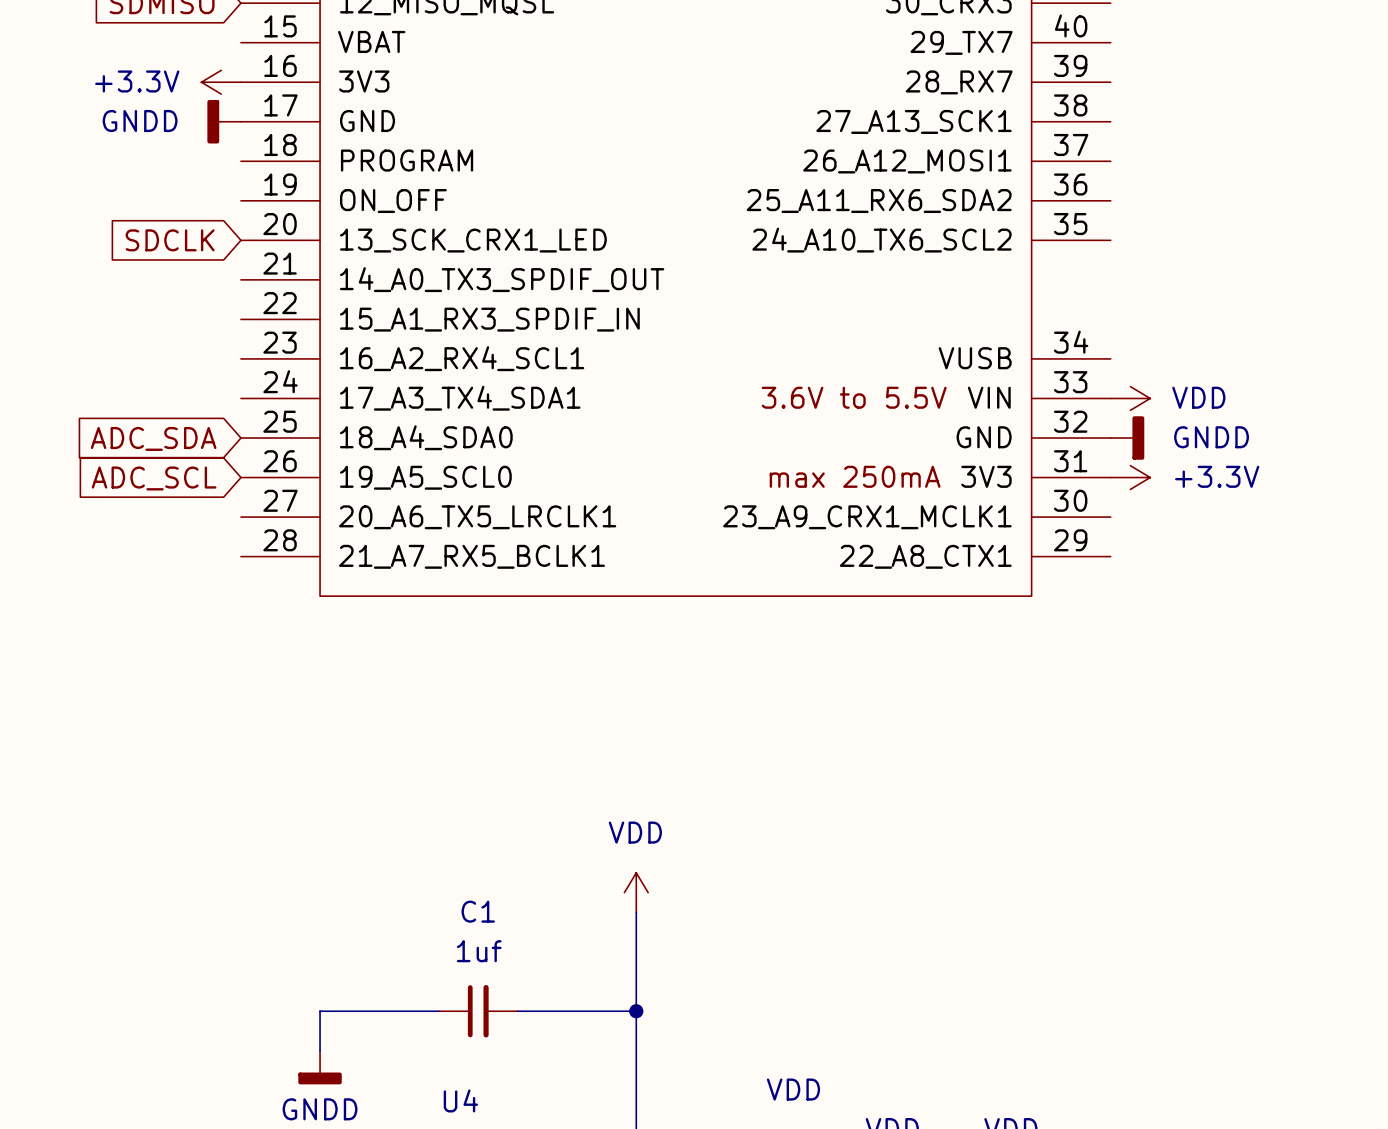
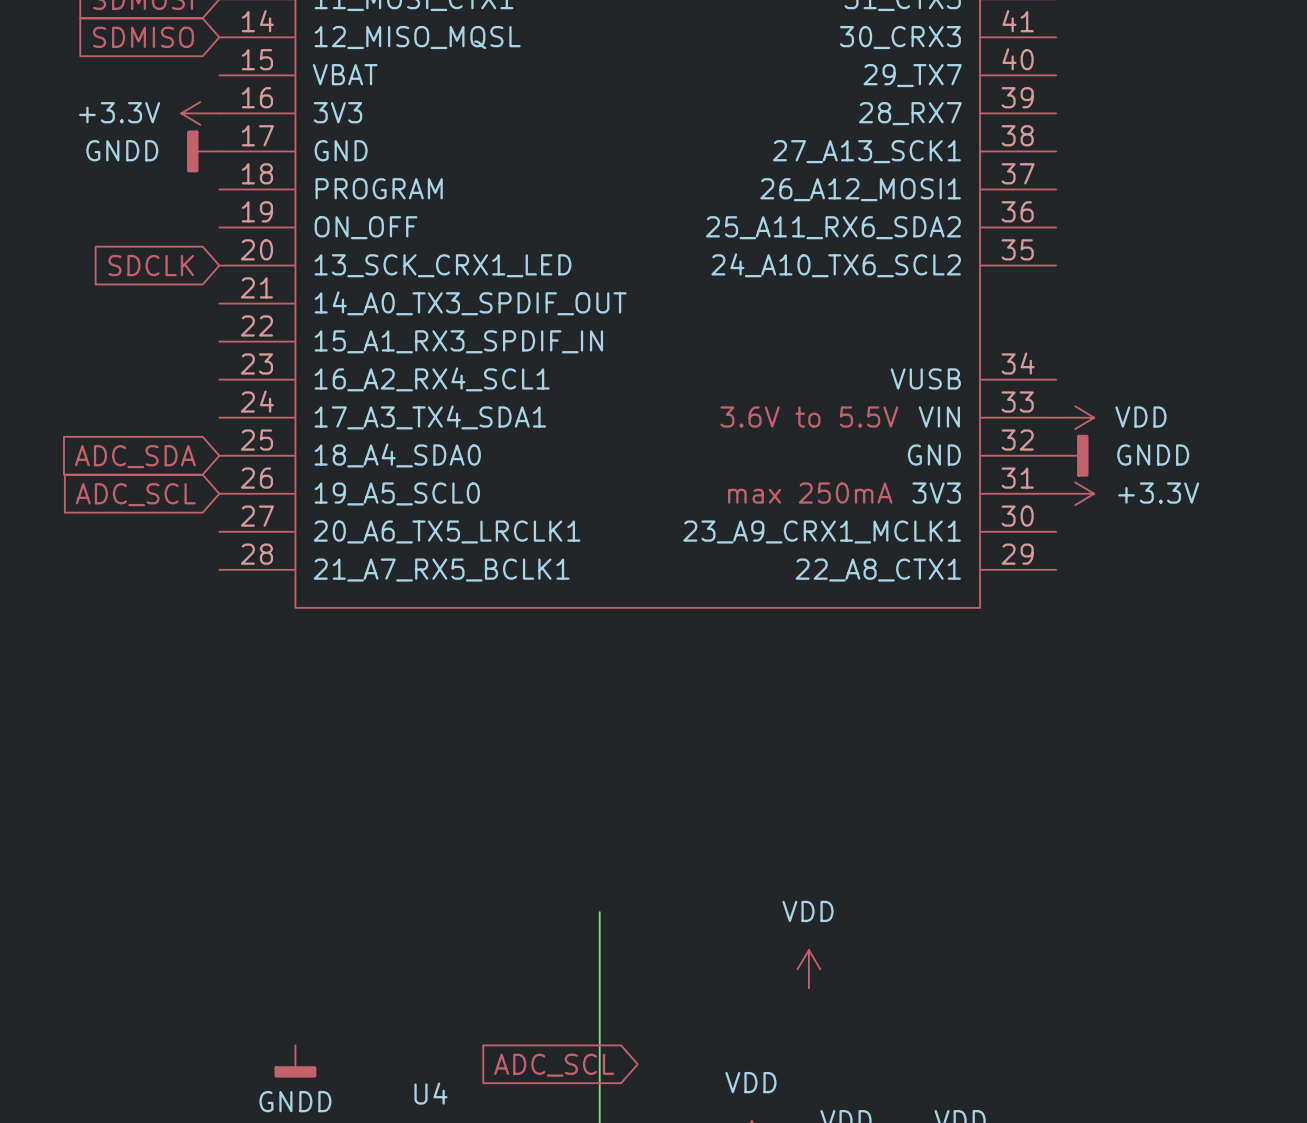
power symbol position: VDD (636, 892) -> VDD (808, 969)
wire: (438, 1011) (320, 1011) (320, 1050) -> none
C1: 1uf (478, 1011) -> none
wire: (517, 1011) (636, 1011) -> none
junction: (636, 1011) -> none
global label: none -> ADC_SCL (554, 1065)

